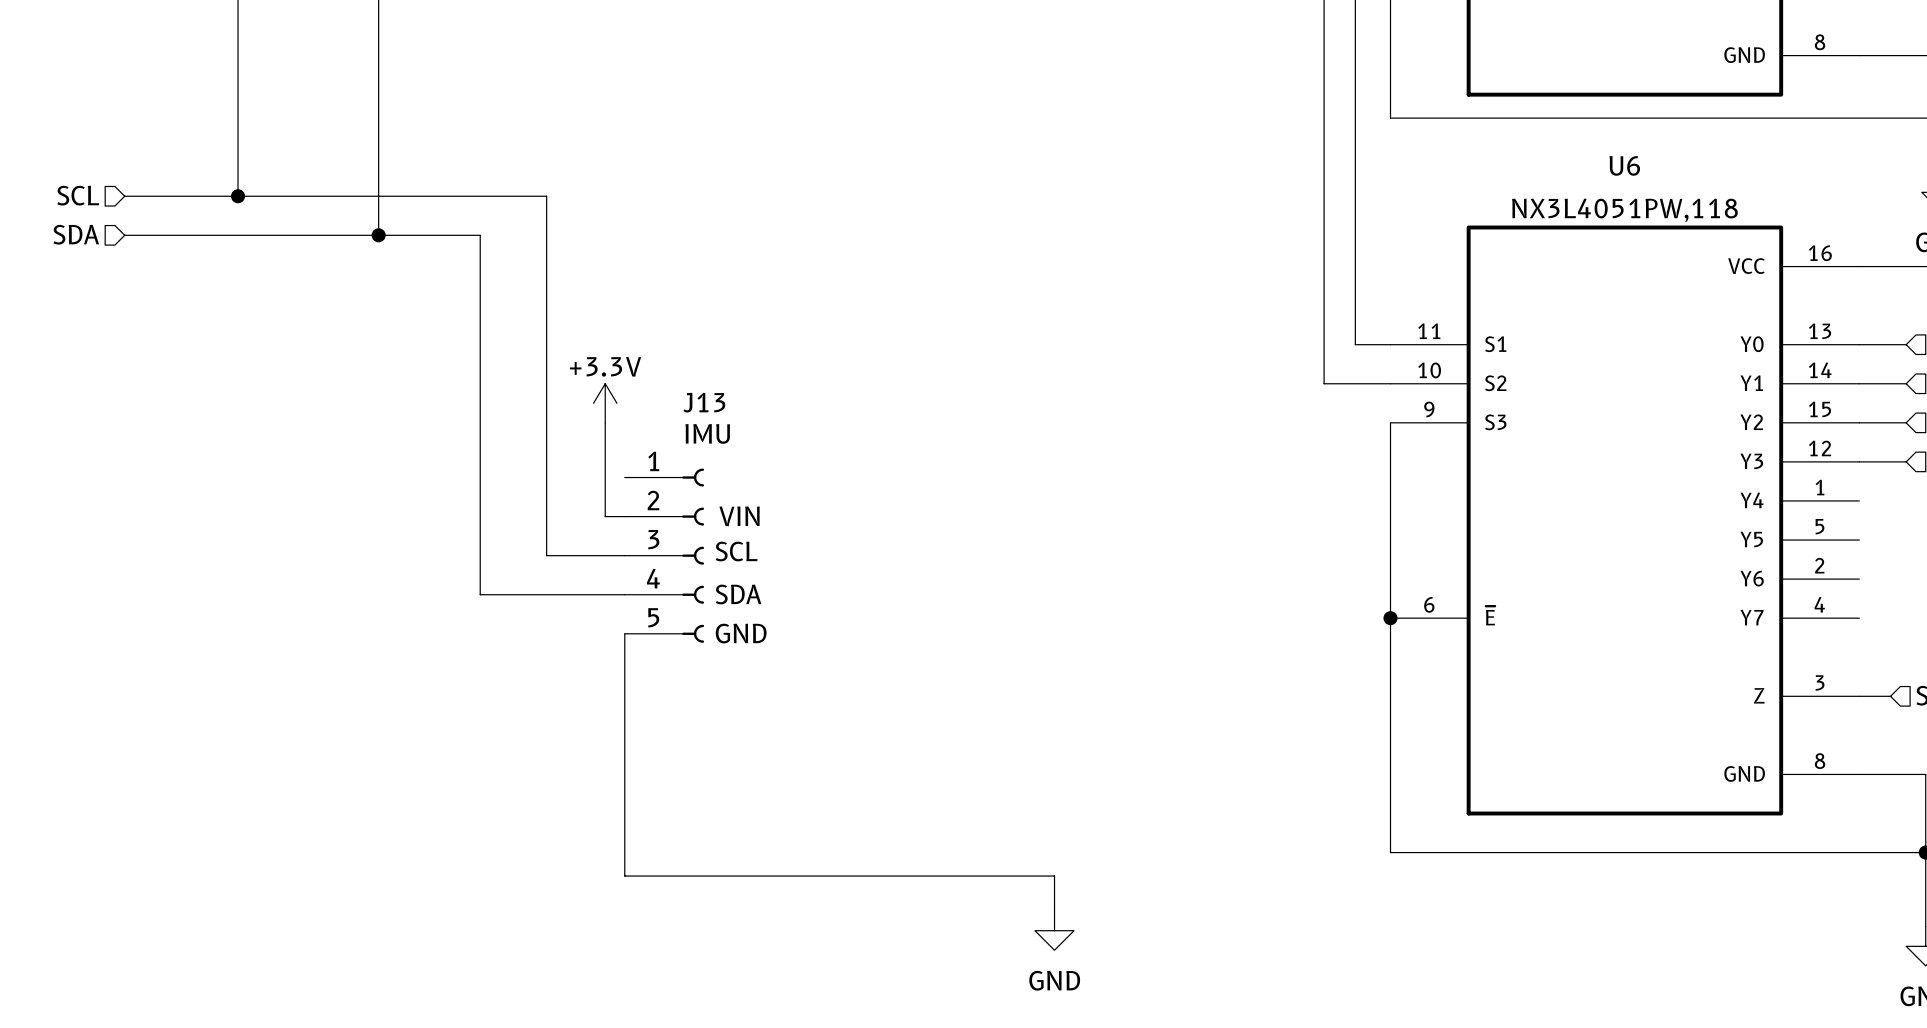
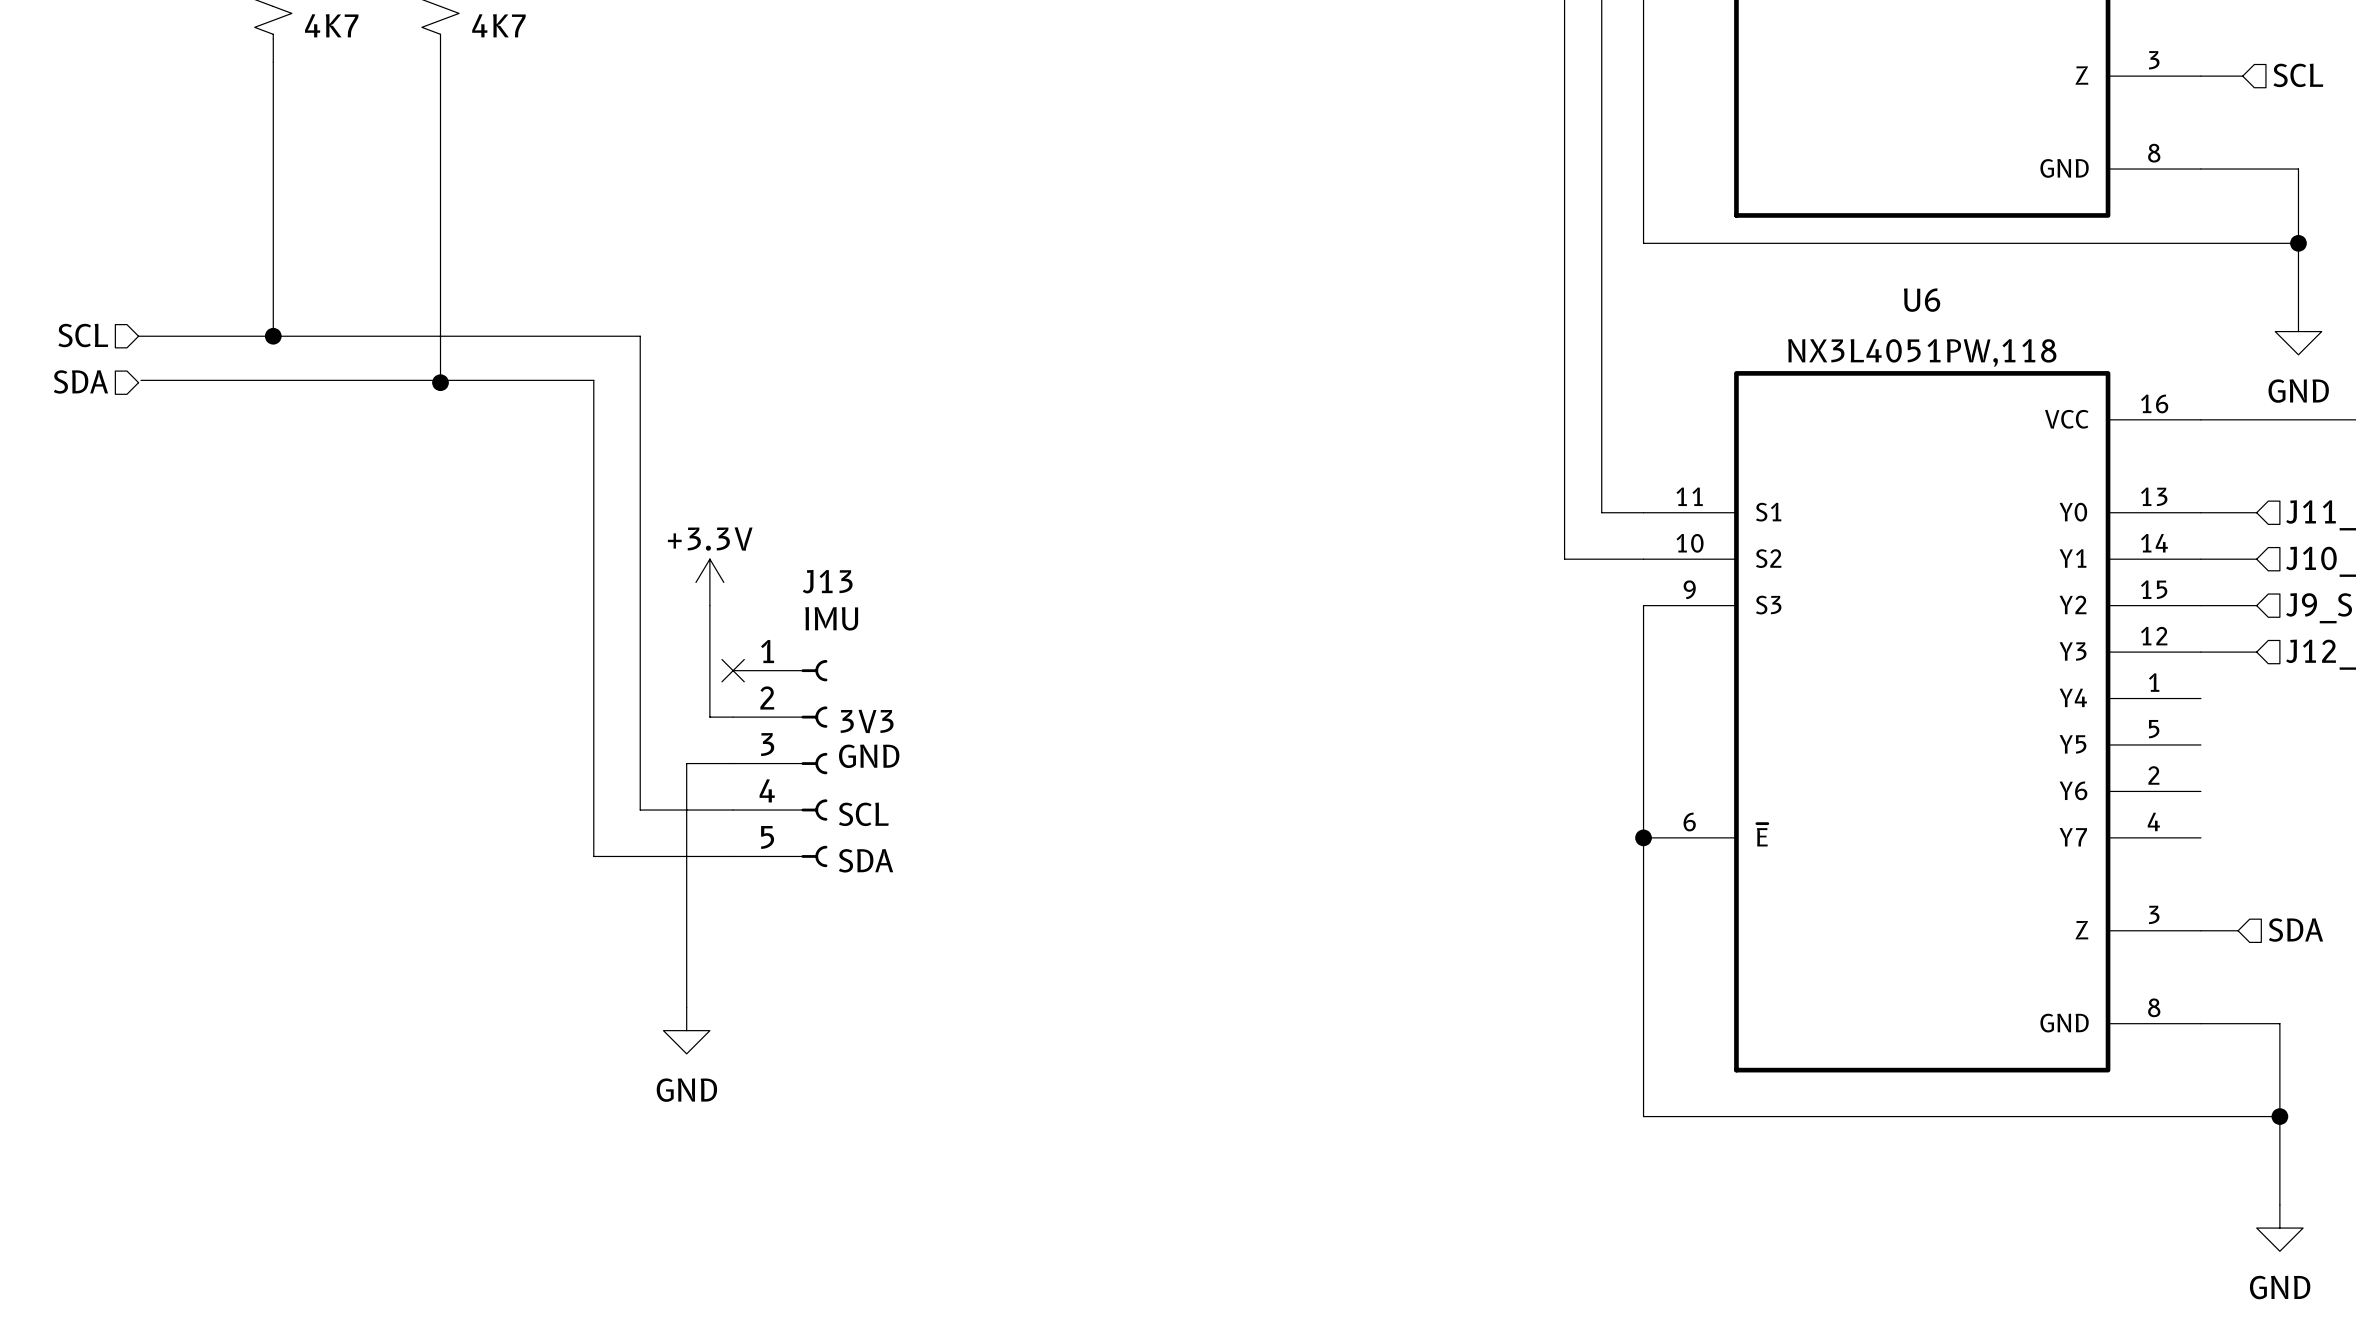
wire: (124, 235) (480, 235) (480, 594) (546, 594) -> none
no-connect mark: none -> (733, 670)
text: VIN (739, 516) -> 3V3 (867, 721)
text: SCL (736, 551) -> GND (869, 756)
wire: (546, 555) (585, 555) -> (640, 763) (640, 810)
wire: none -> (686, 763) (686, 1007)
text: SDA (738, 594) -> SCL (863, 814)
wire: (624, 633) (624, 876) (1054, 876) (1054, 911) -> (733, 856) (593, 856) (593, 380) (140, 380)
text: GND (741, 633) -> SDA (866, 860)
power symbol: none -> GND (686, 1030)
power symbol: GND (1054, 930) -> none

